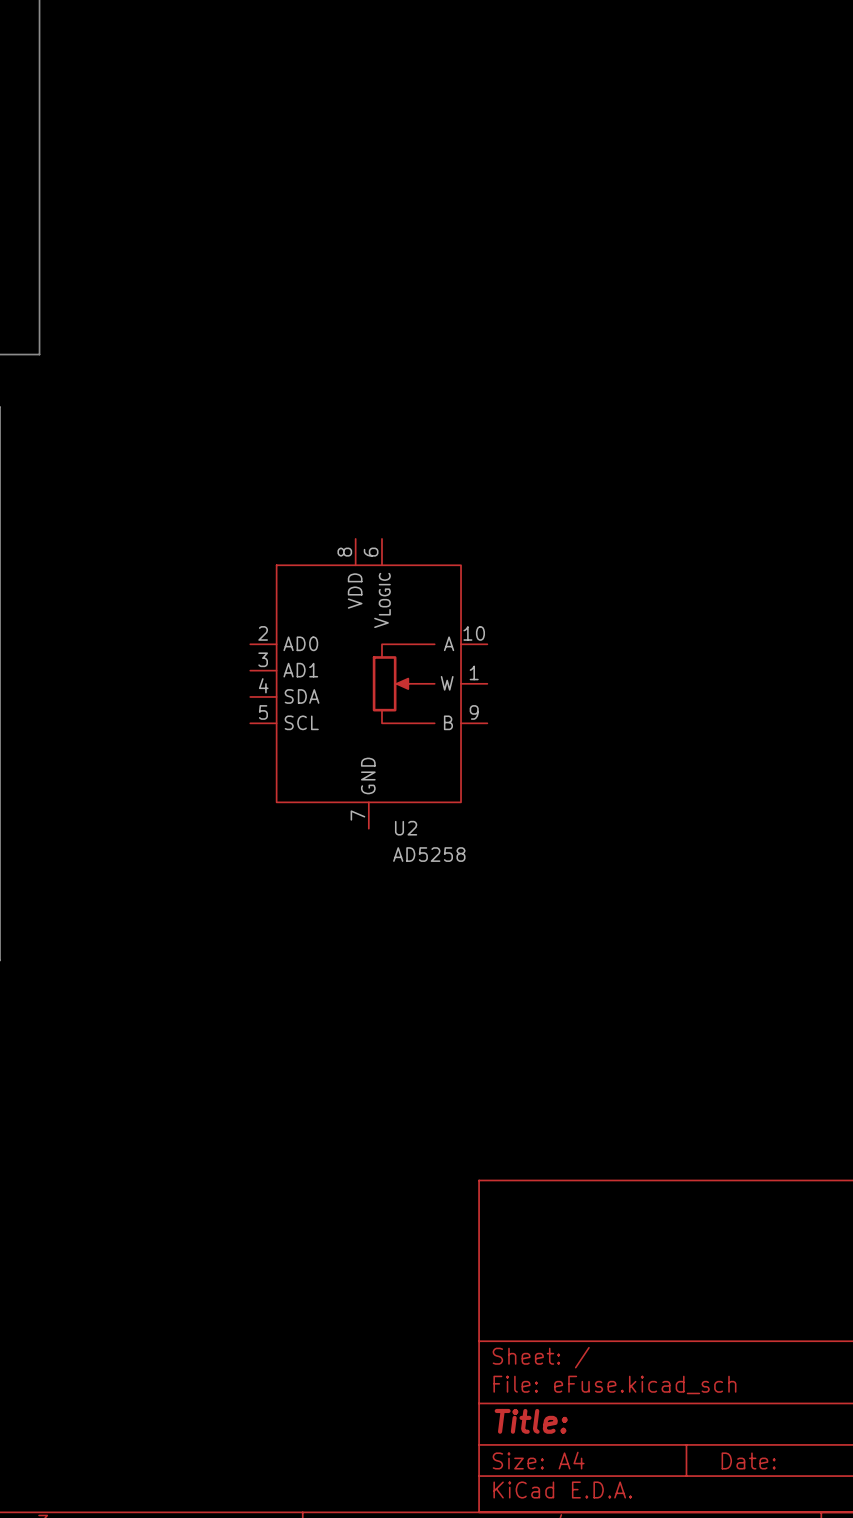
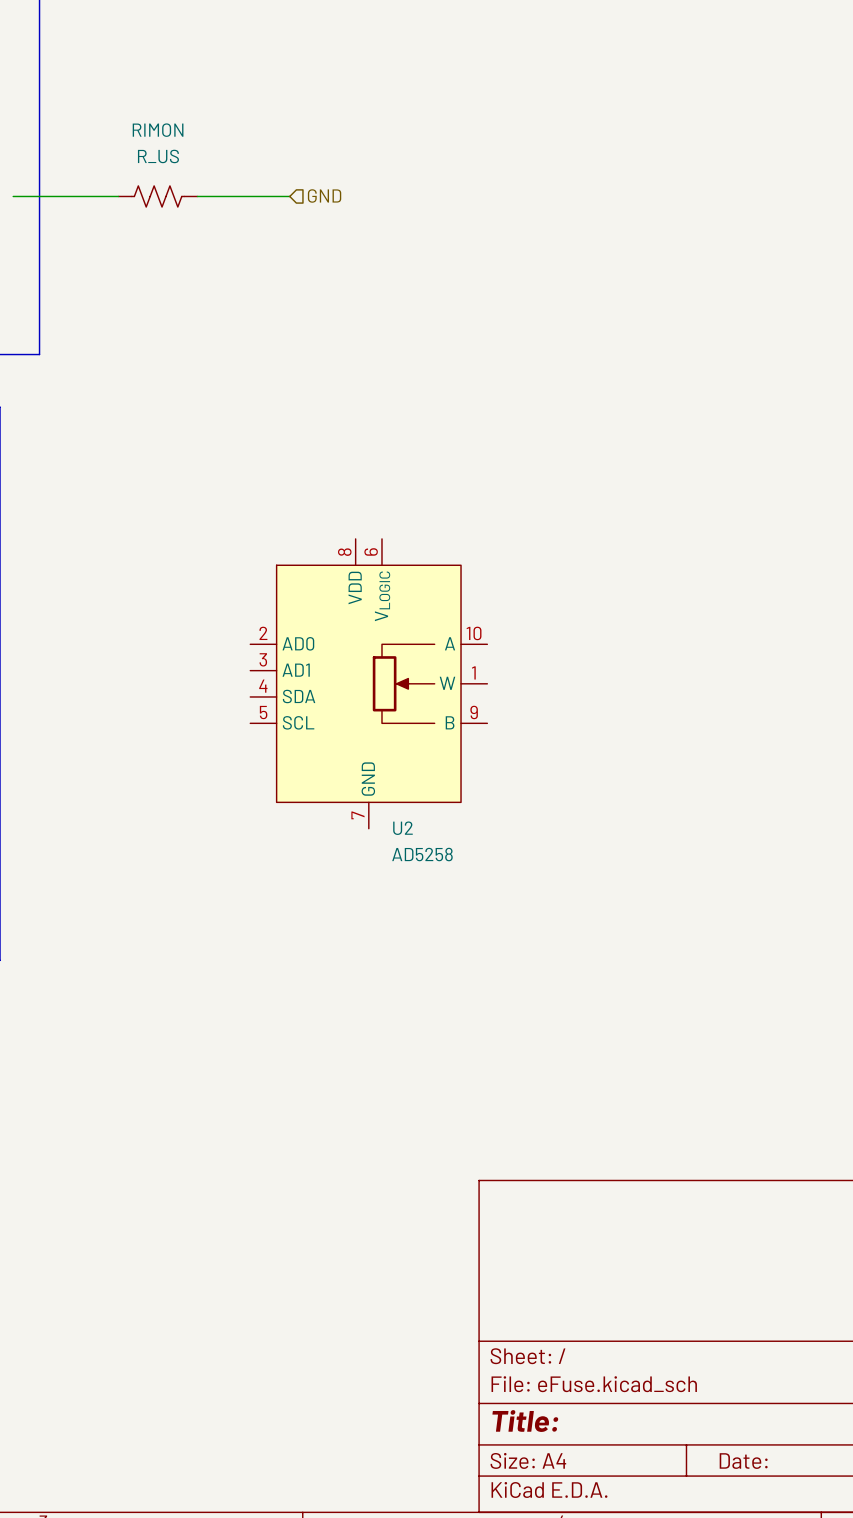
hierarchical label: none -> GND (324, 195)
wire: none -> (13, 196) (118, 196)
RIMON: none -> R_US (158, 196)
wire: none -> (197, 196) (289, 196)

